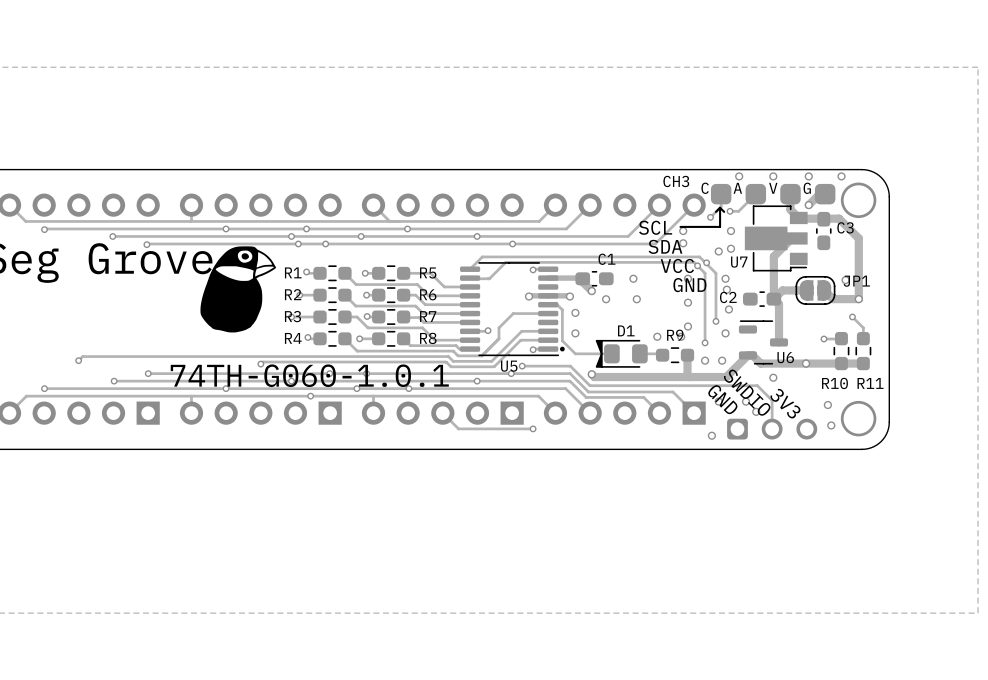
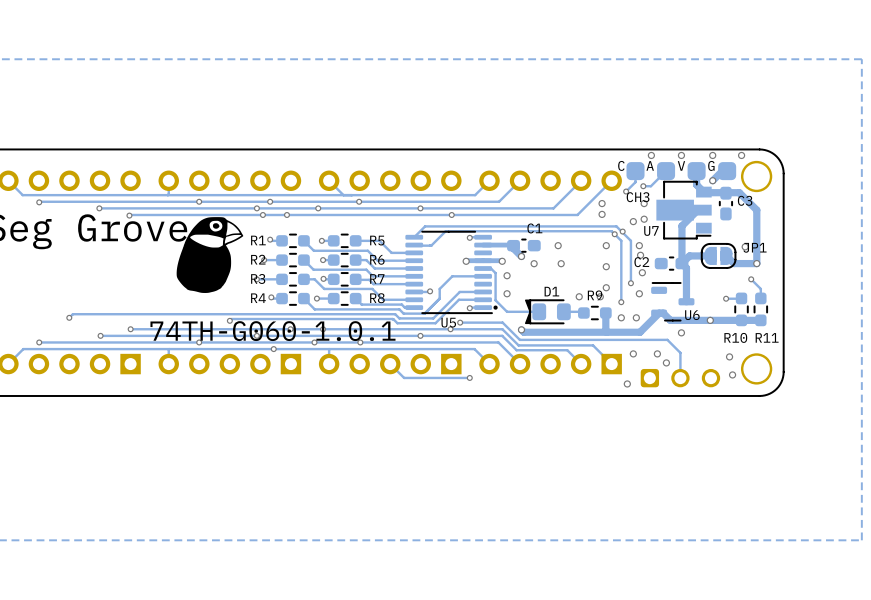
CH3 name position: CH3 (676, 181) -> CH3 (638, 197)
line: (720, 207) (715, 211) -> none
line: (720, 207) (720, 226) (680, 226) -> none
line: (720, 207) (724, 211) -> none
text: SCL (655, 227) -> none
text: SDA (665, 246) -> none
text: VCC (677, 265) -> none
text: GND (689, 285) -> none
text: SWDIO (747, 392) -> none
text: GND (722, 399) -> none
text: 3V3 (785, 403) -> none

